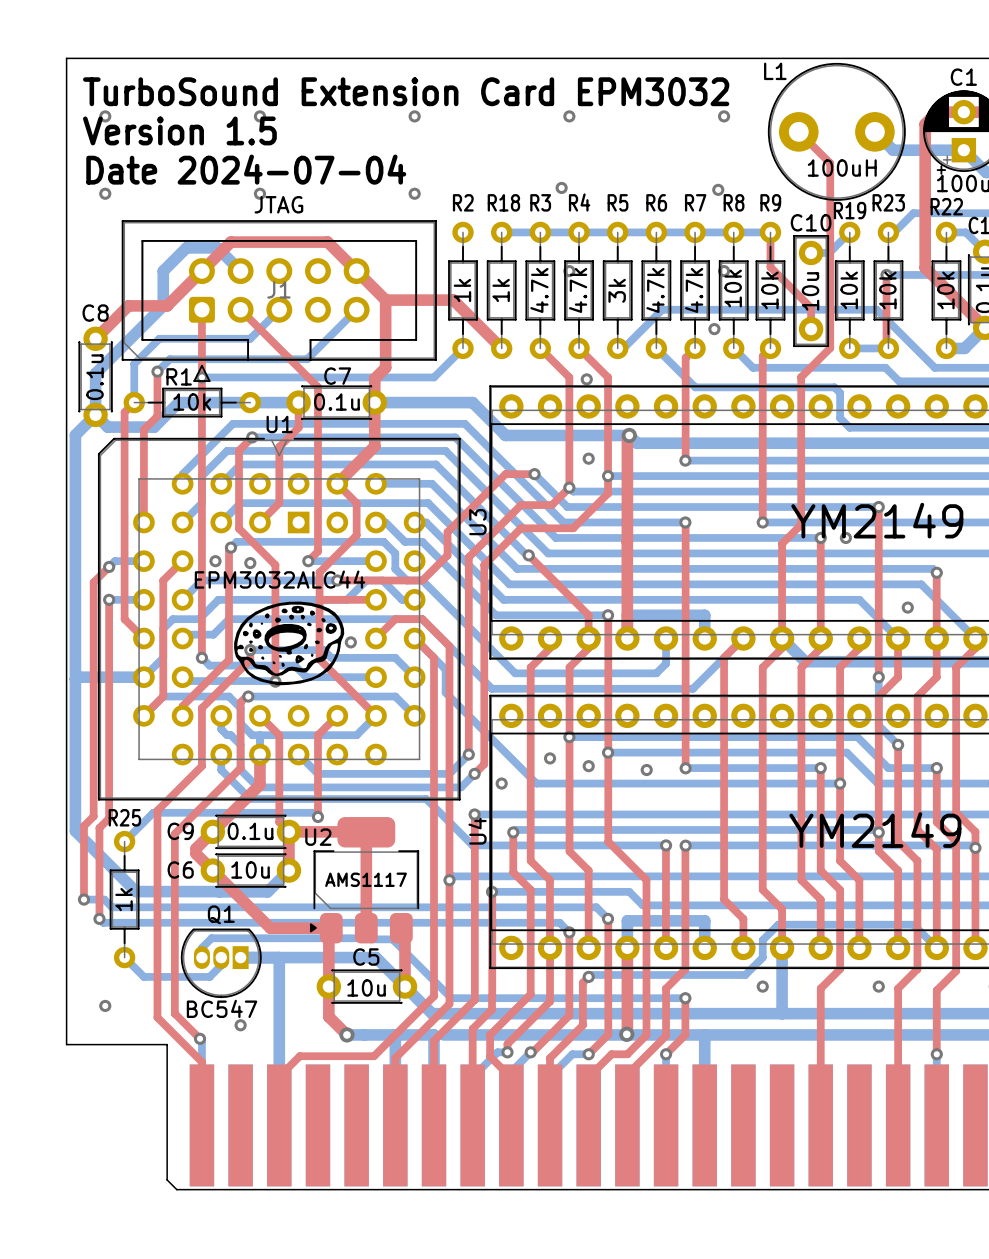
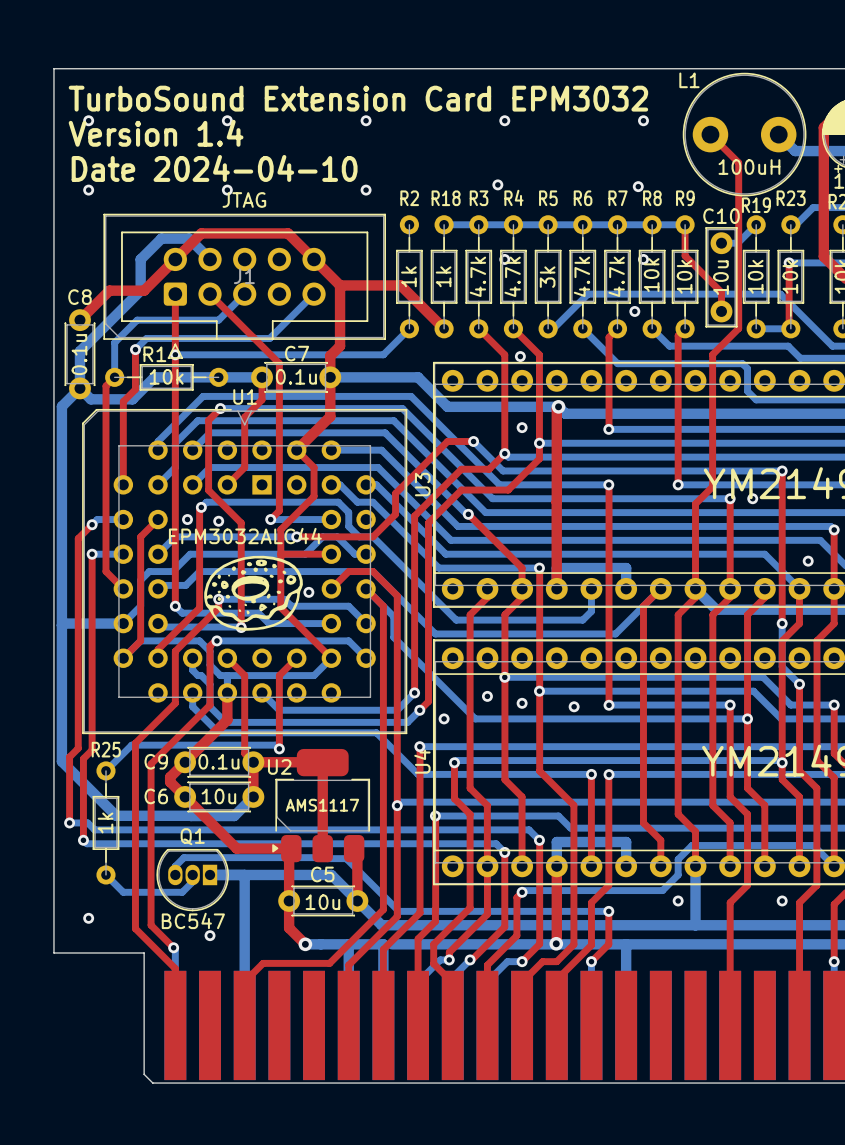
text: Version 1.5 (179, 130) -> Version 1.4 (156, 133)
text: Date 2024-07-04 (246, 169) -> Date 2024-04-10 (214, 168)

